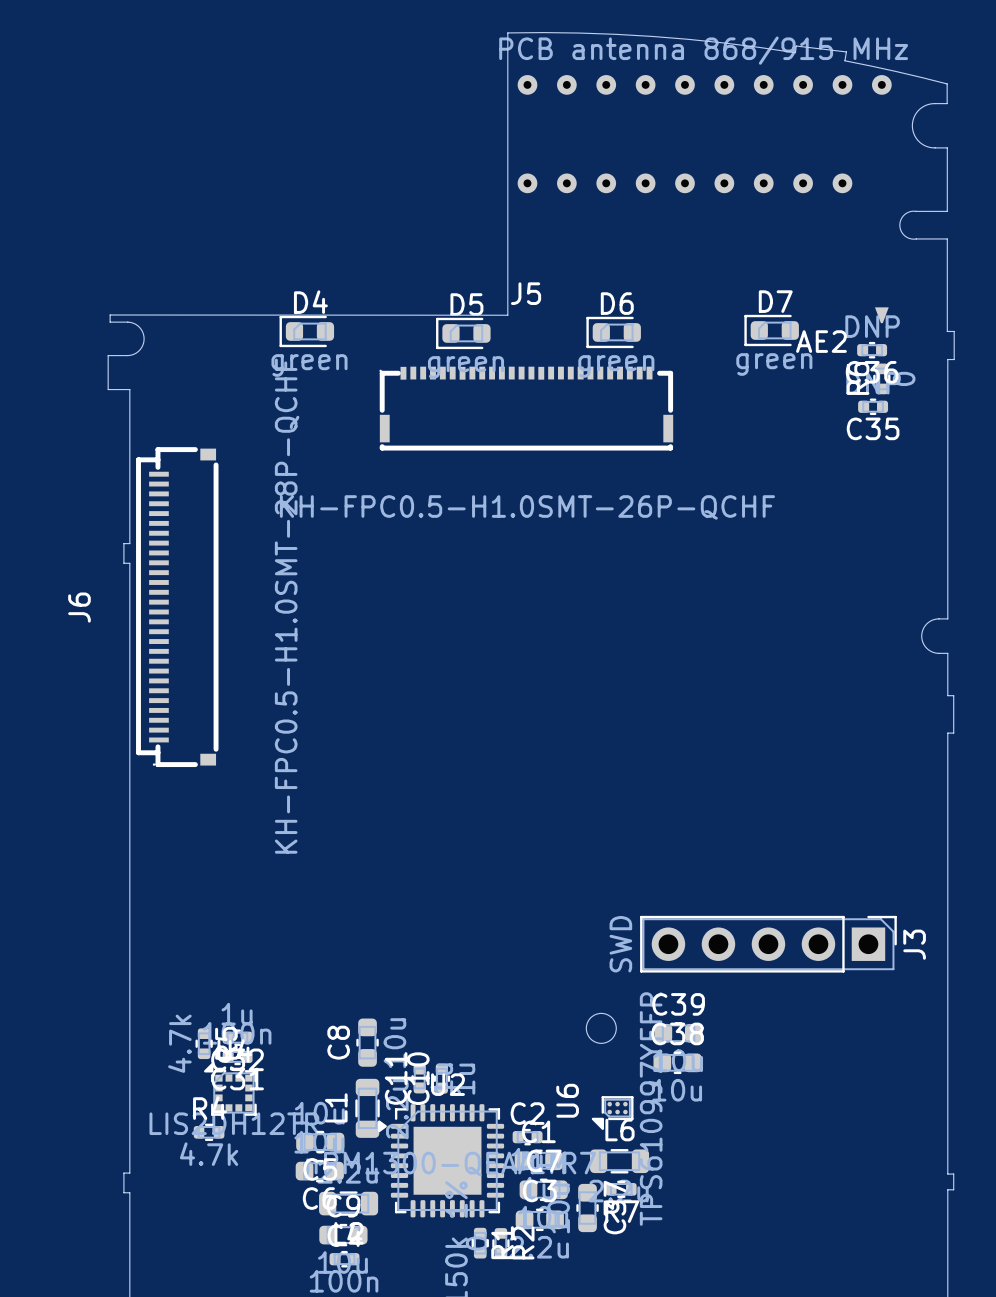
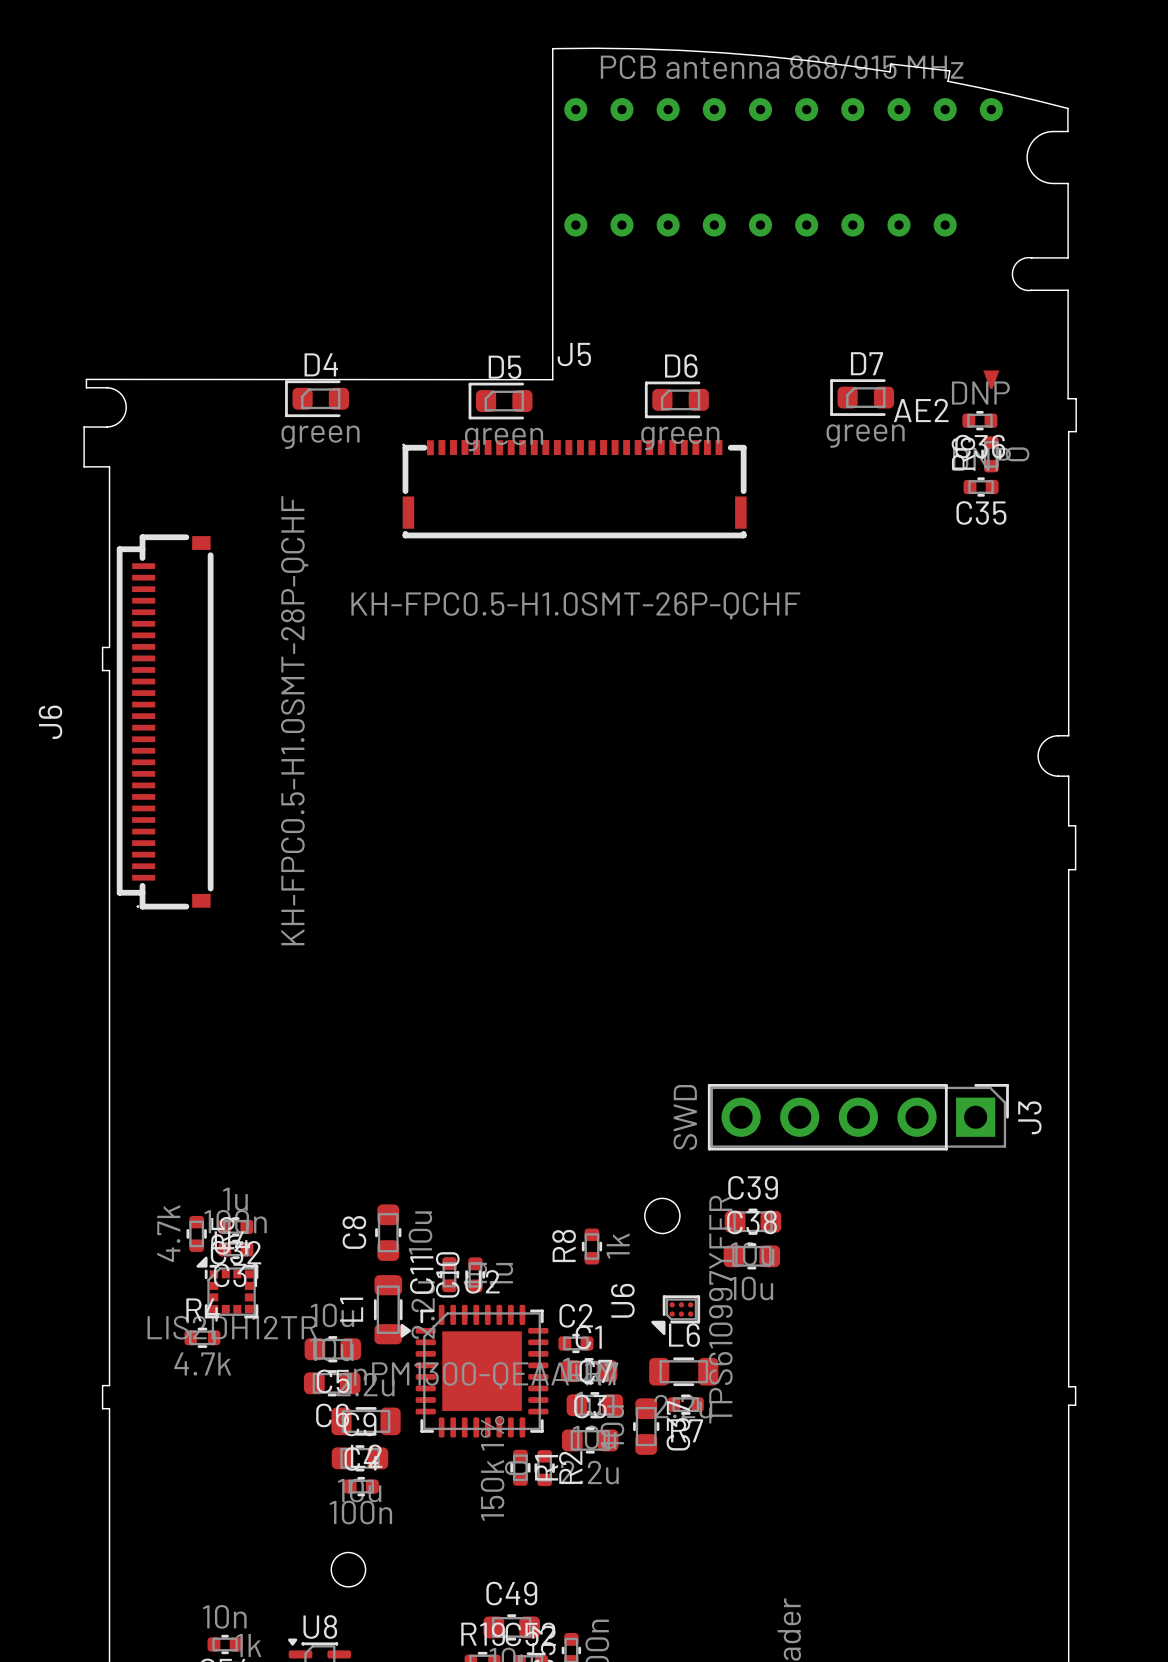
R8: none -> 1k (591, 1246)

